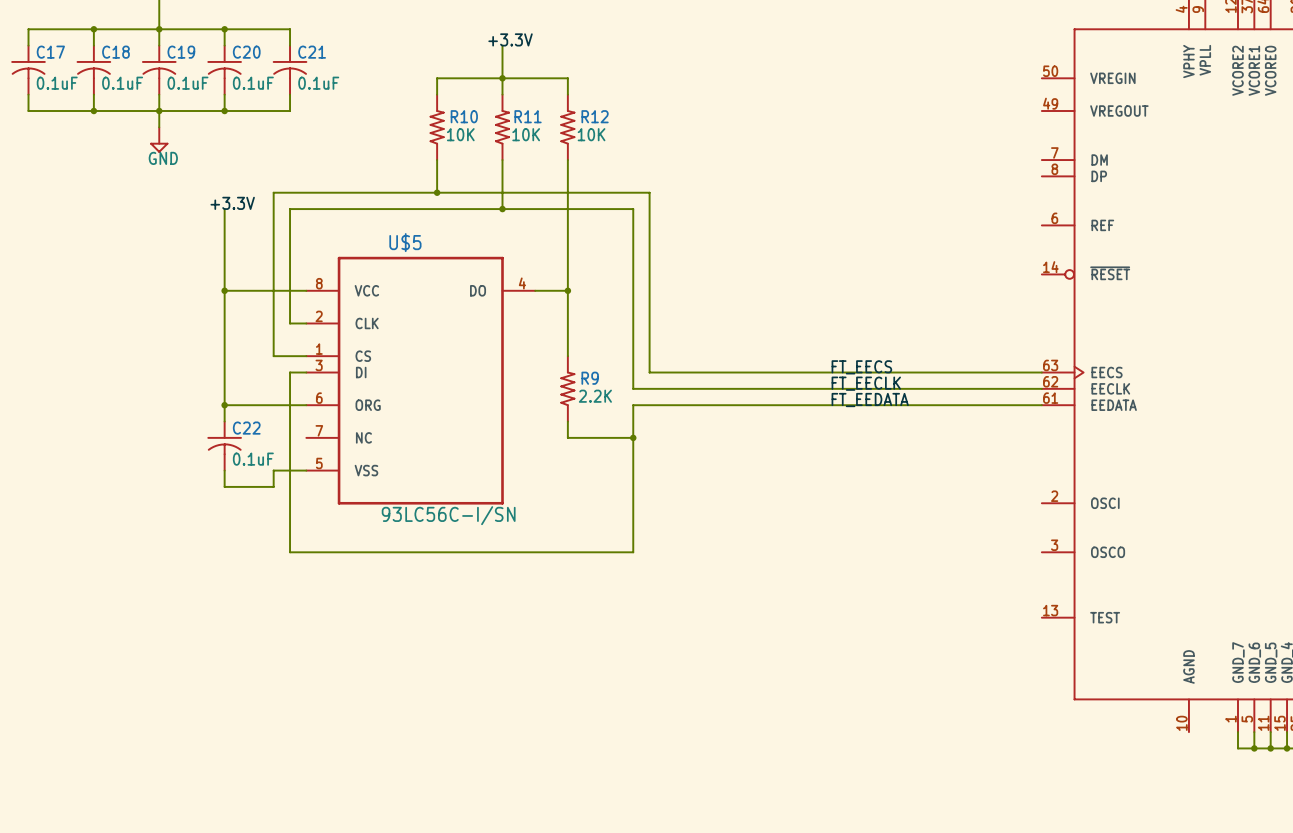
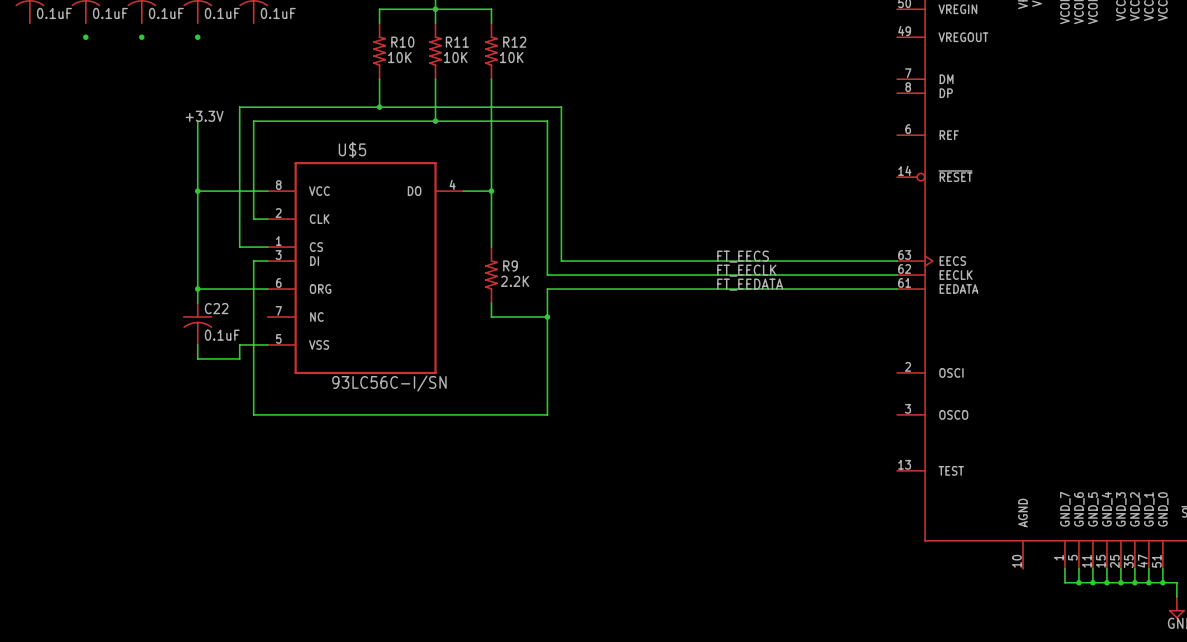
wire: (28, 94) (28, 111) (290, 111) (290, 94) -> none
wire: (93, 94) (93, 111) -> none
wire: (159, 94) (159, 127) -> none
wire: (224, 94) (224, 111) -> none
power symbol: GND (159, 140) -> none

